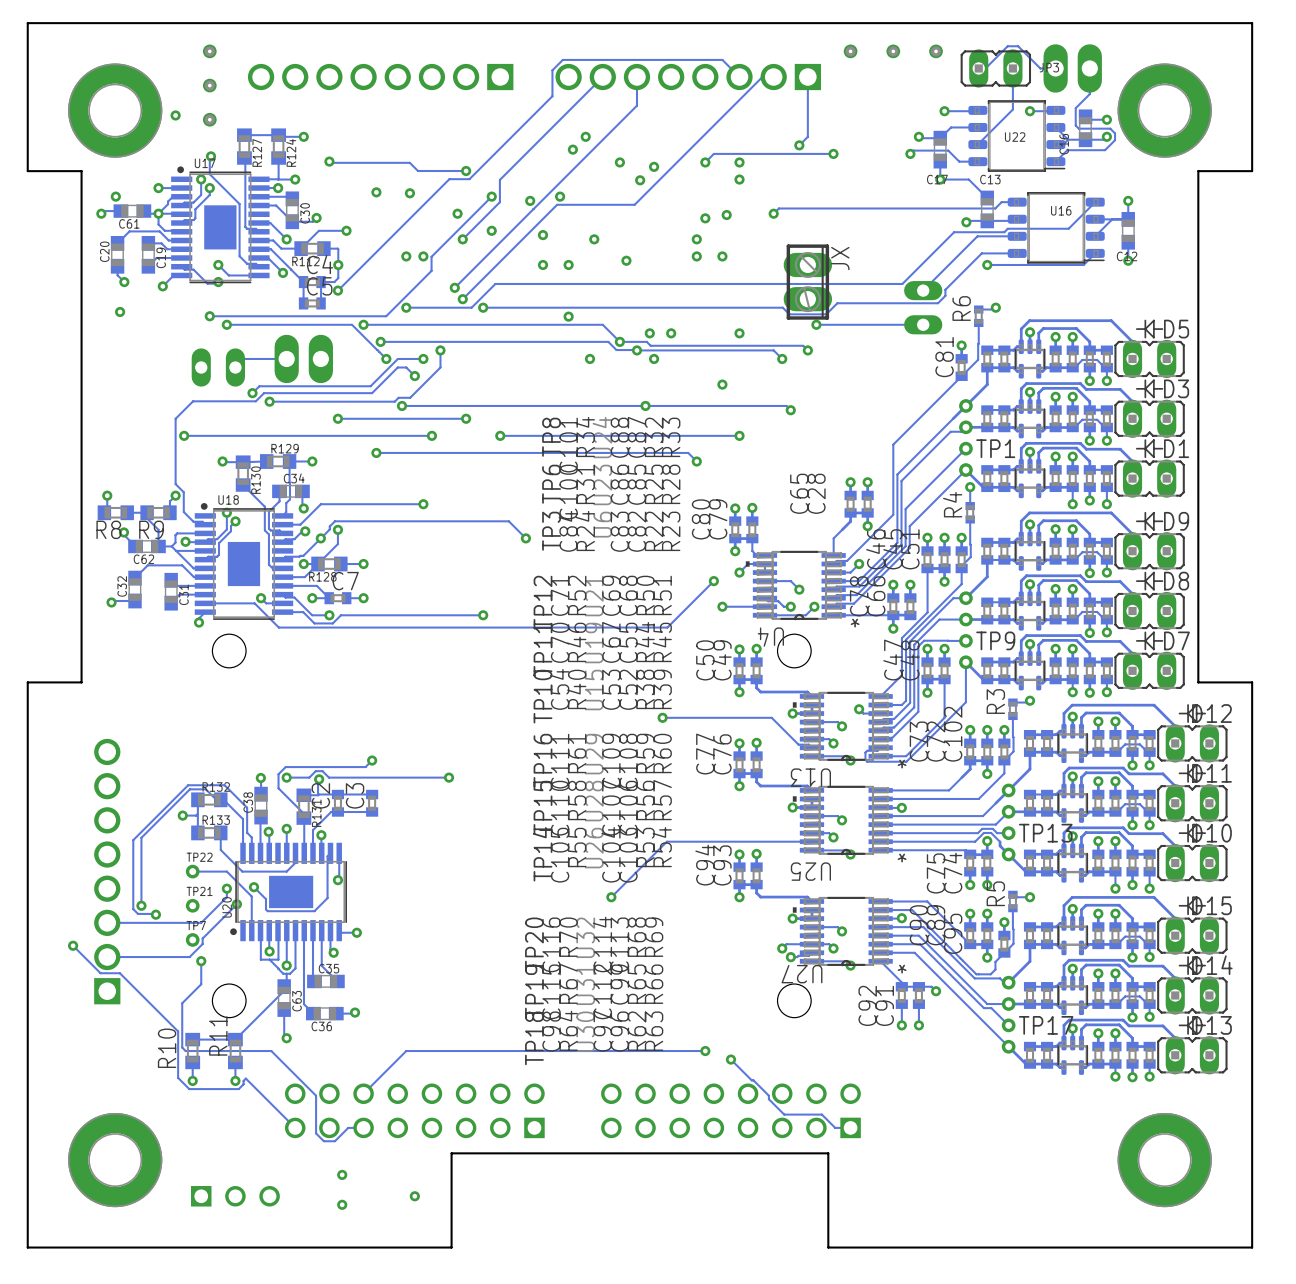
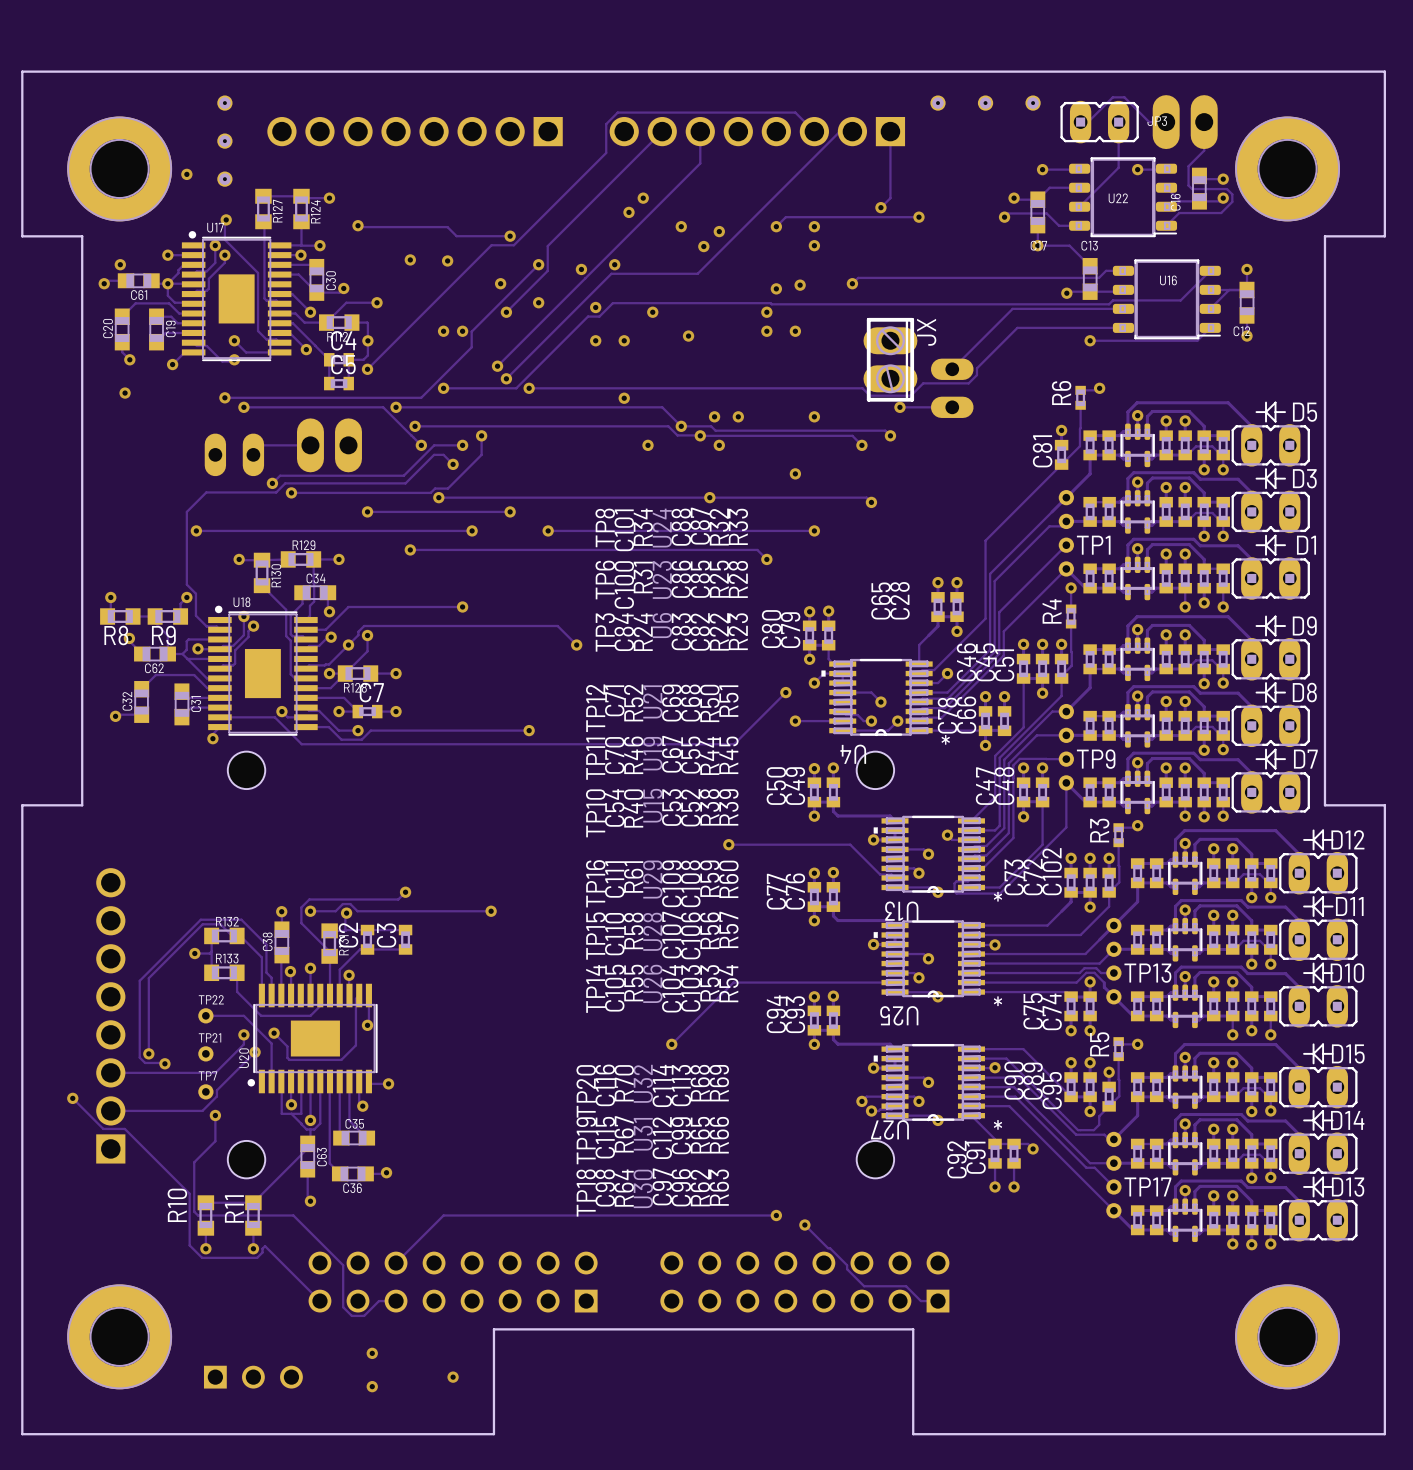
track: (954, 232) (902, 283) (495, 283) -> (1053, 304) (612, 303) (599, 316) (588, 316) (542, 361)
track: (977, 236) (923, 290) -> (1079, 308) (1012, 308) (952, 369)
track: (981, 253) (945, 289) (945, 295) (938, 303) (878, 303) -> (1083, 327) (1017, 327) (976, 368) (976, 375) (968, 383)
part position: (923, 307) -> (952, 388)
track: (923, 324) (863, 324) -> none

